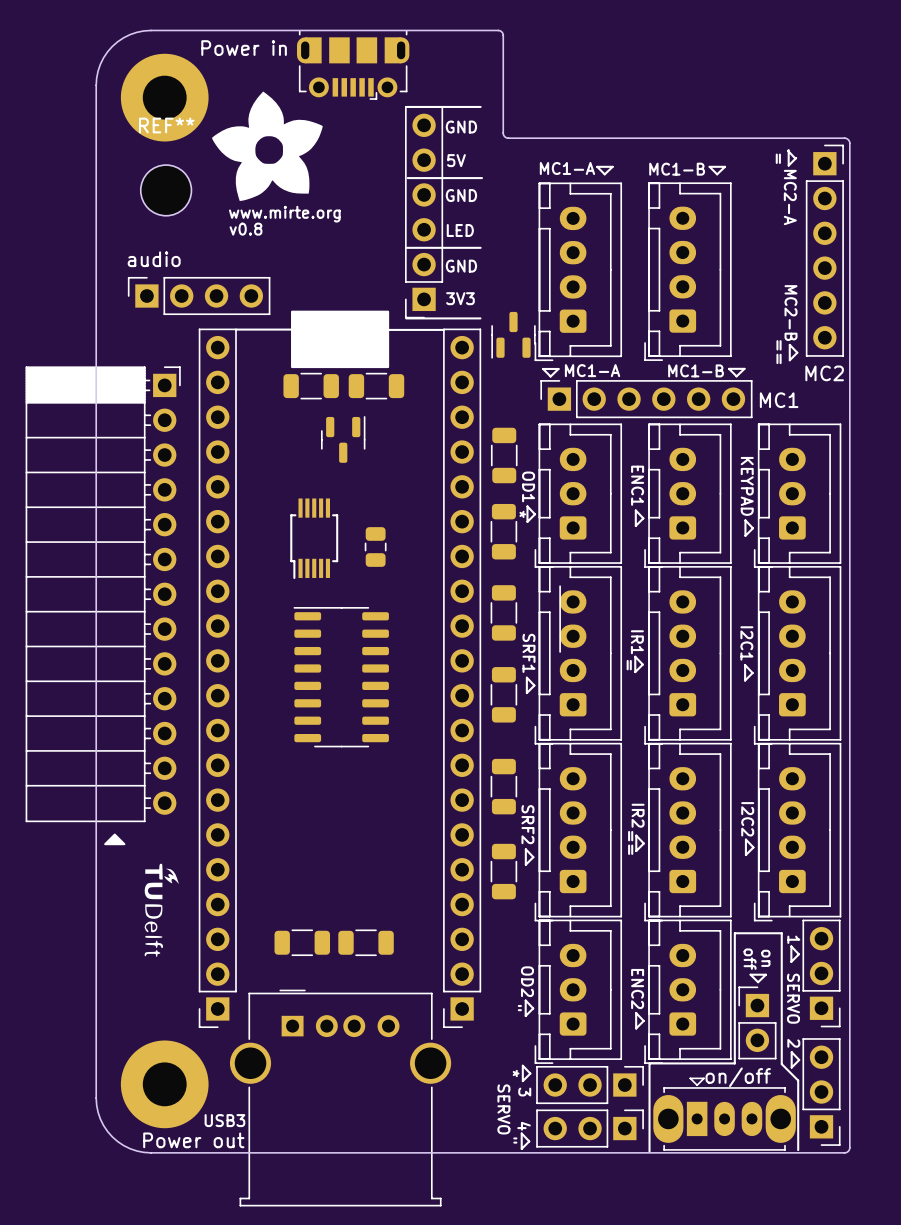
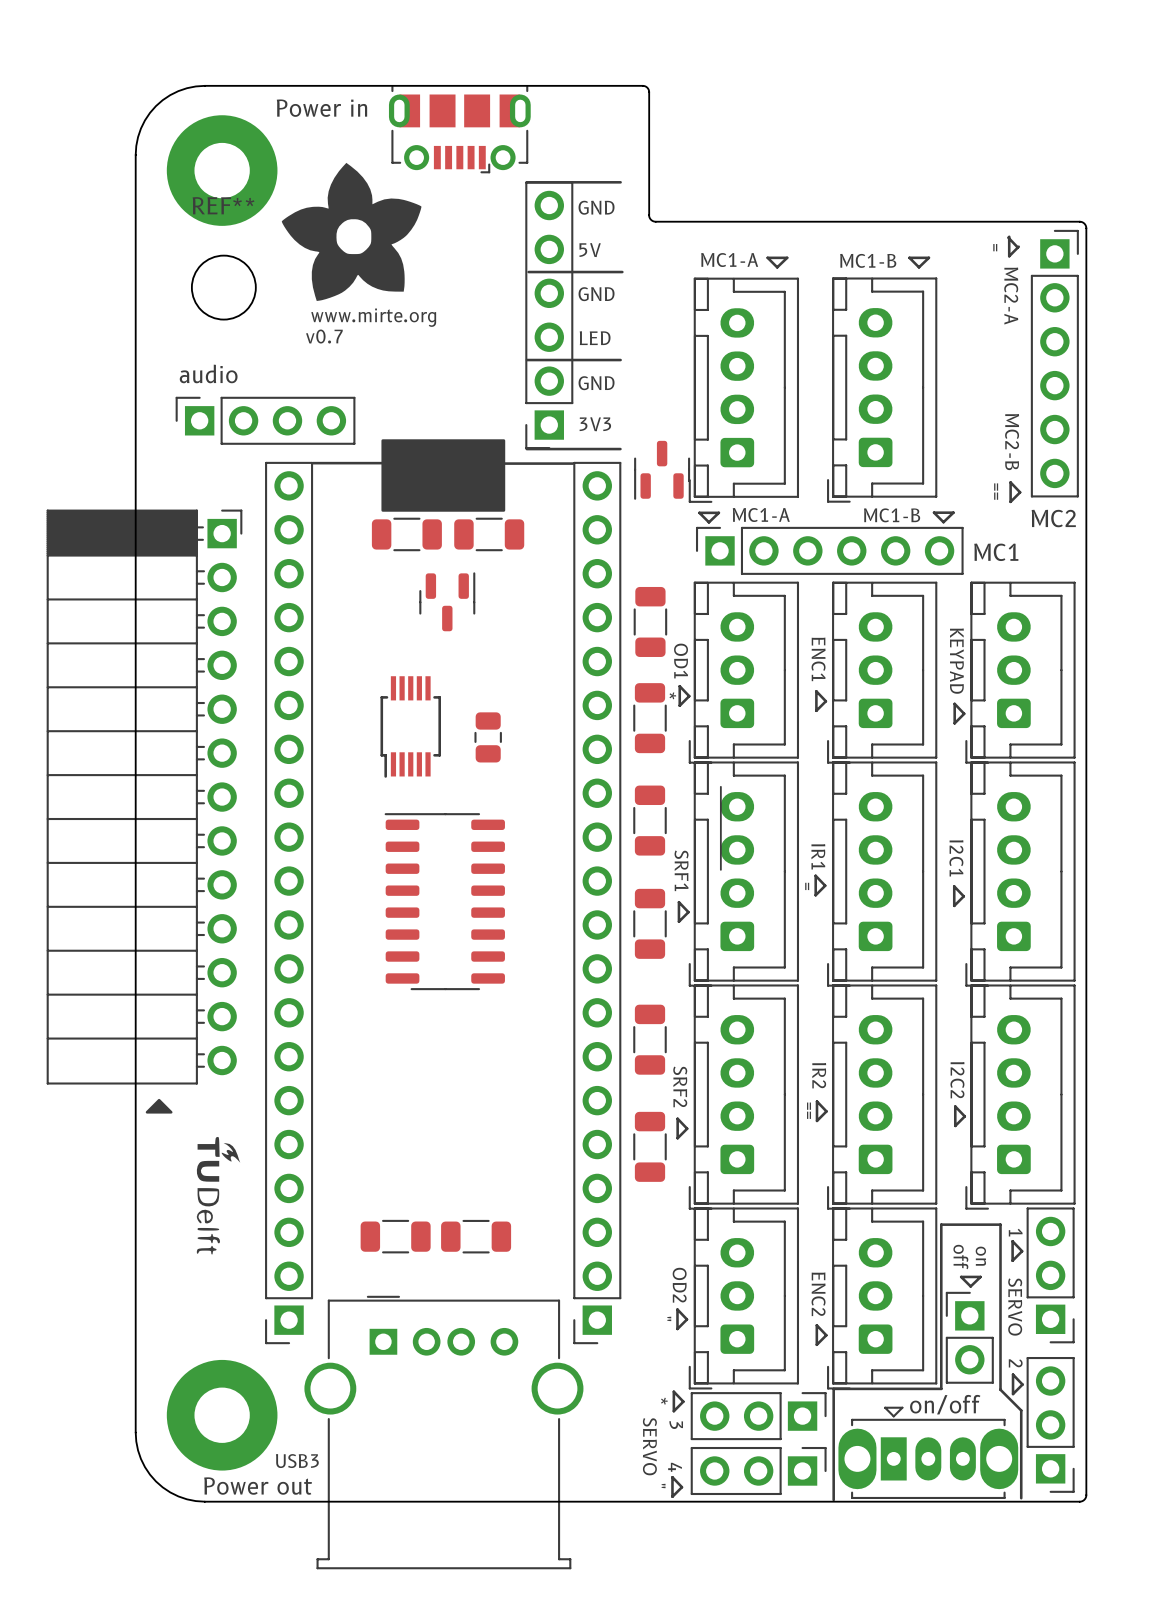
text: v0.8 (246, 229) -> v0.7 (324, 336)

